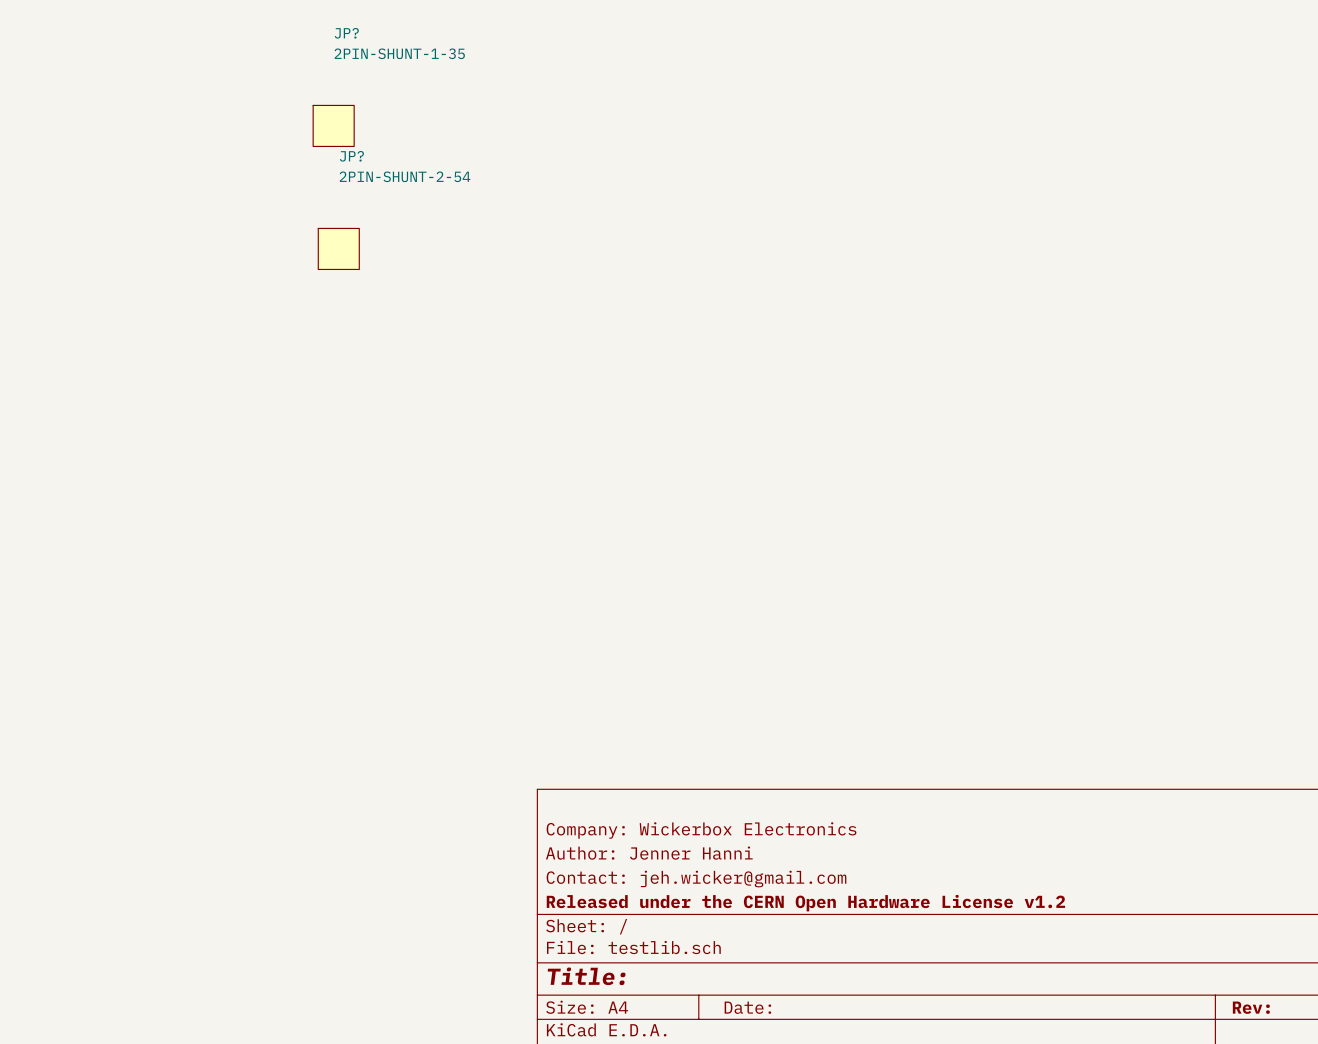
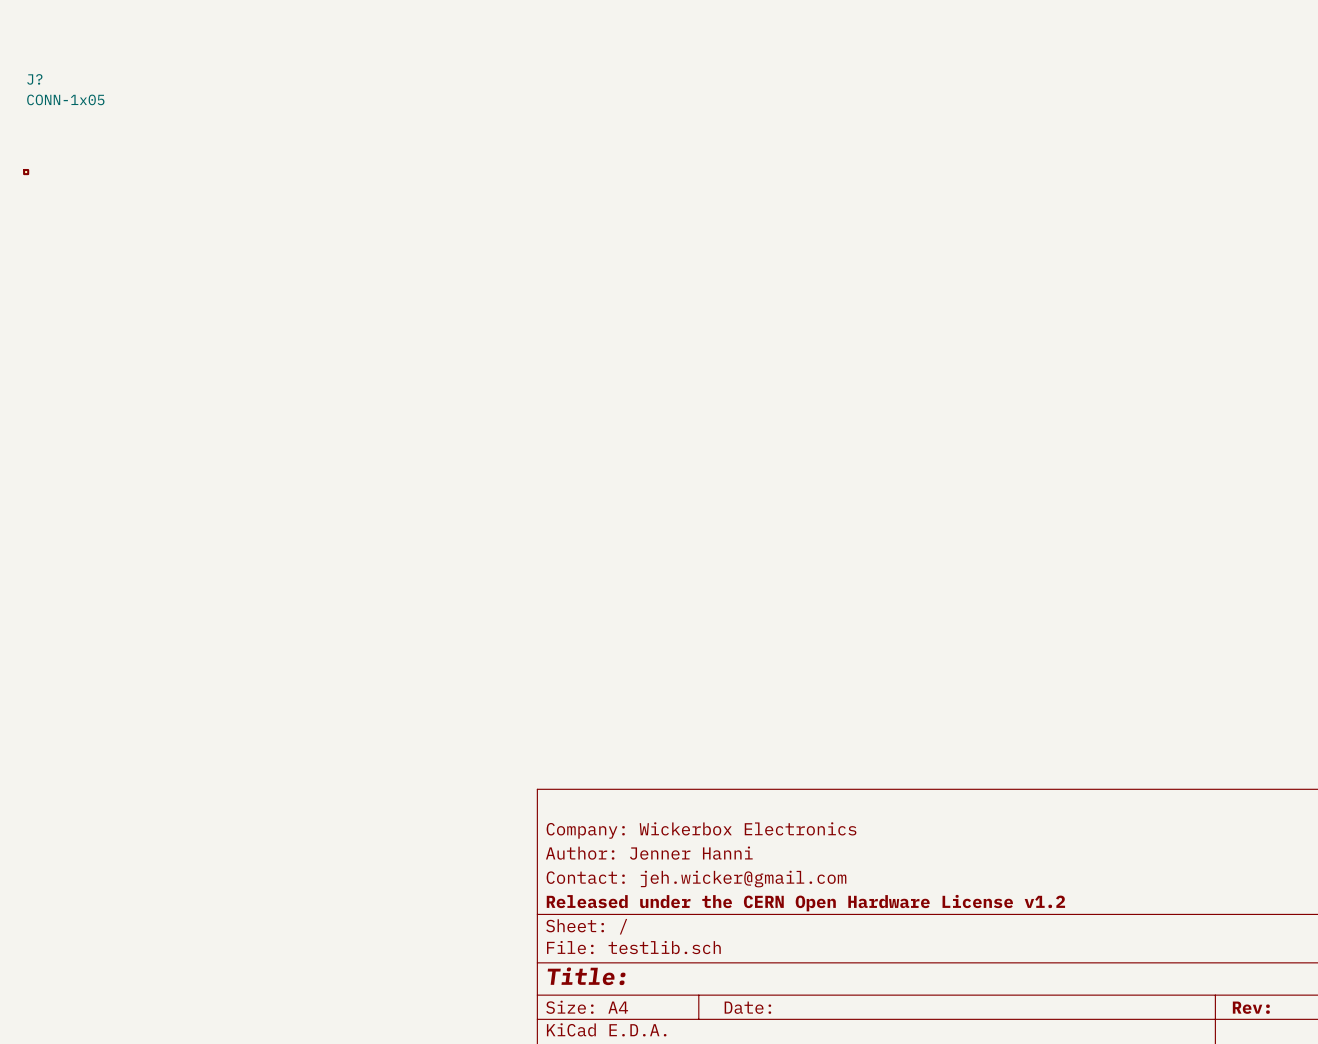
JP?: 2PIN-SHUNT-1-35 (333, 125) -> none
J?: none -> CONN-1x05 (26, 172)
JP?: 2PIN-SHUNT-2-54 (338, 248) -> none

